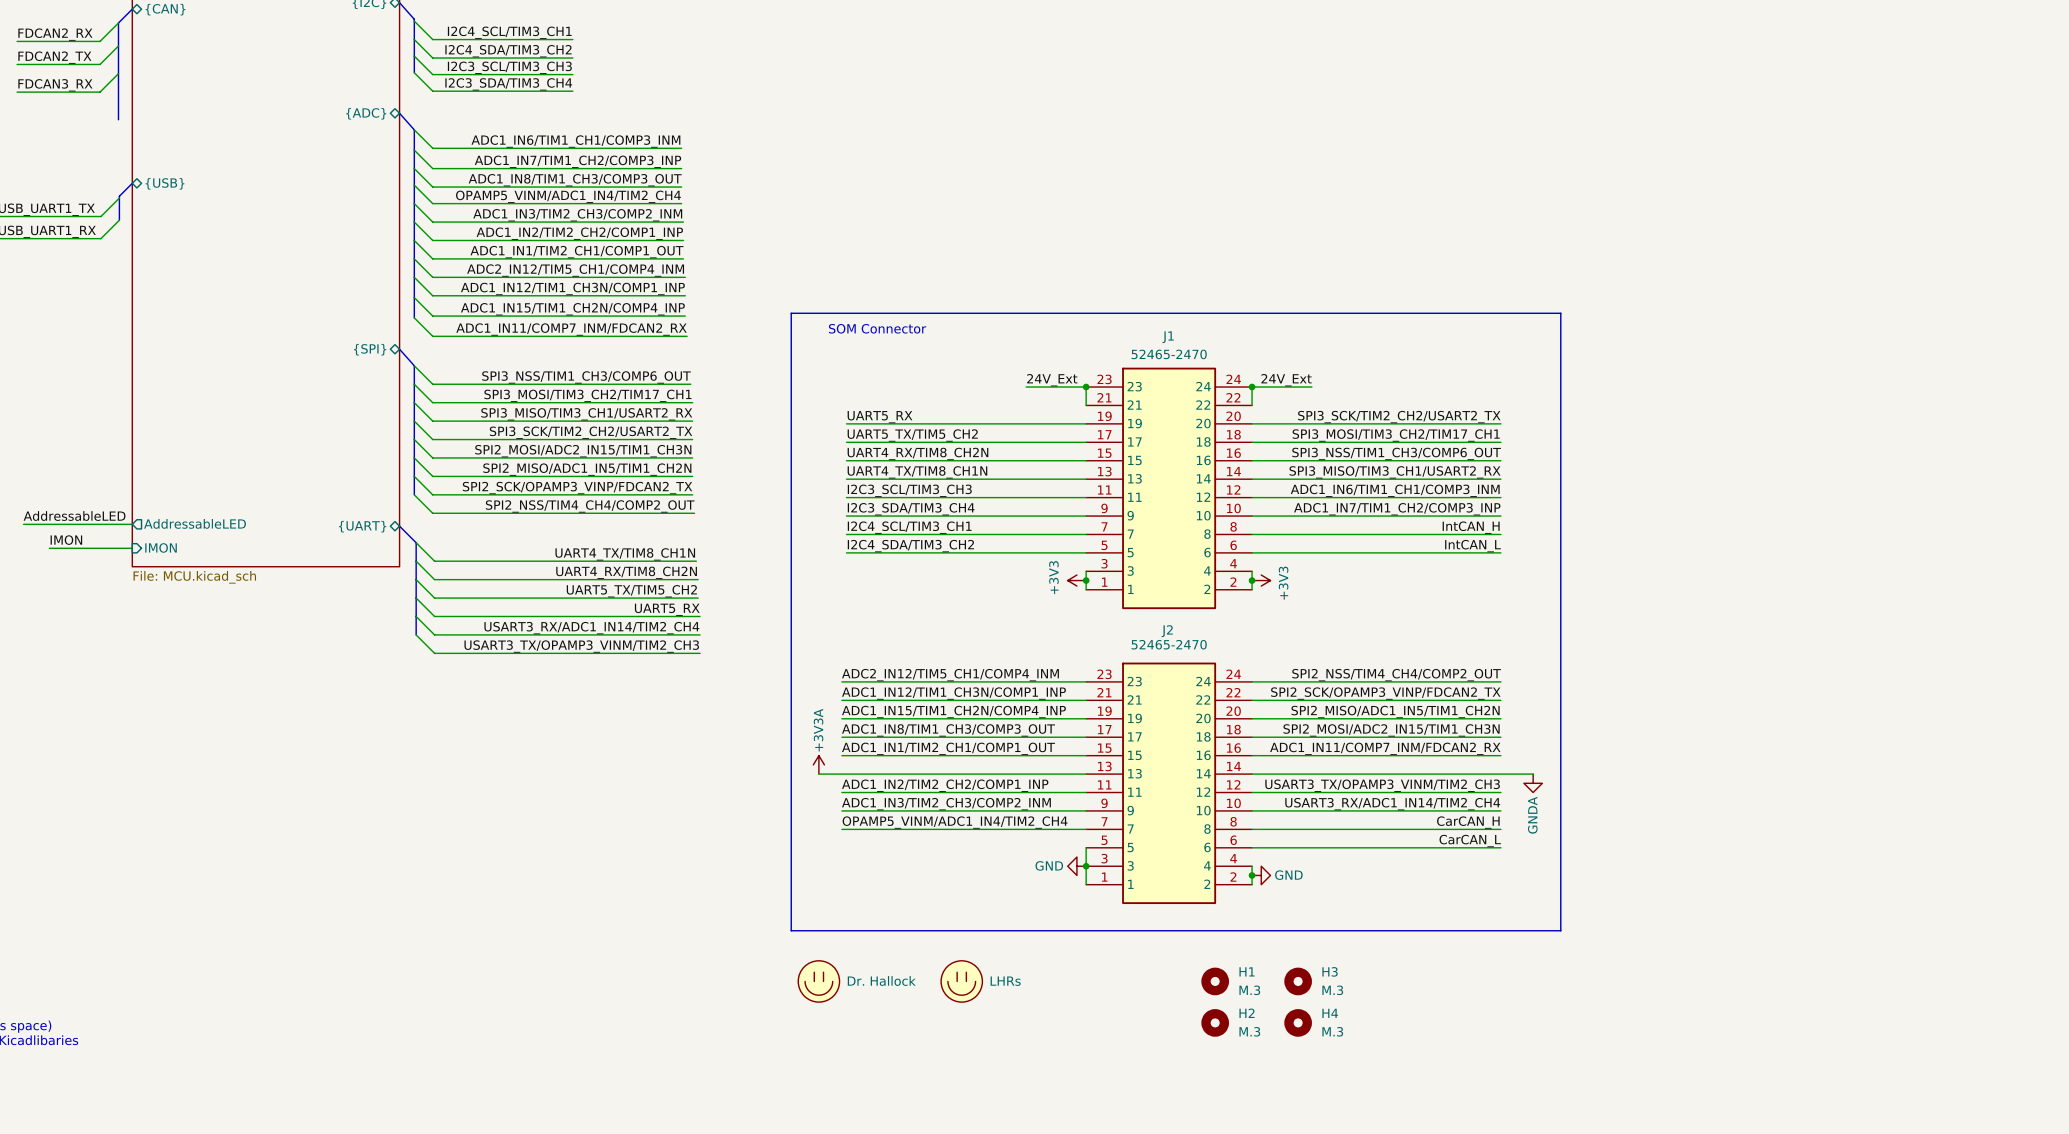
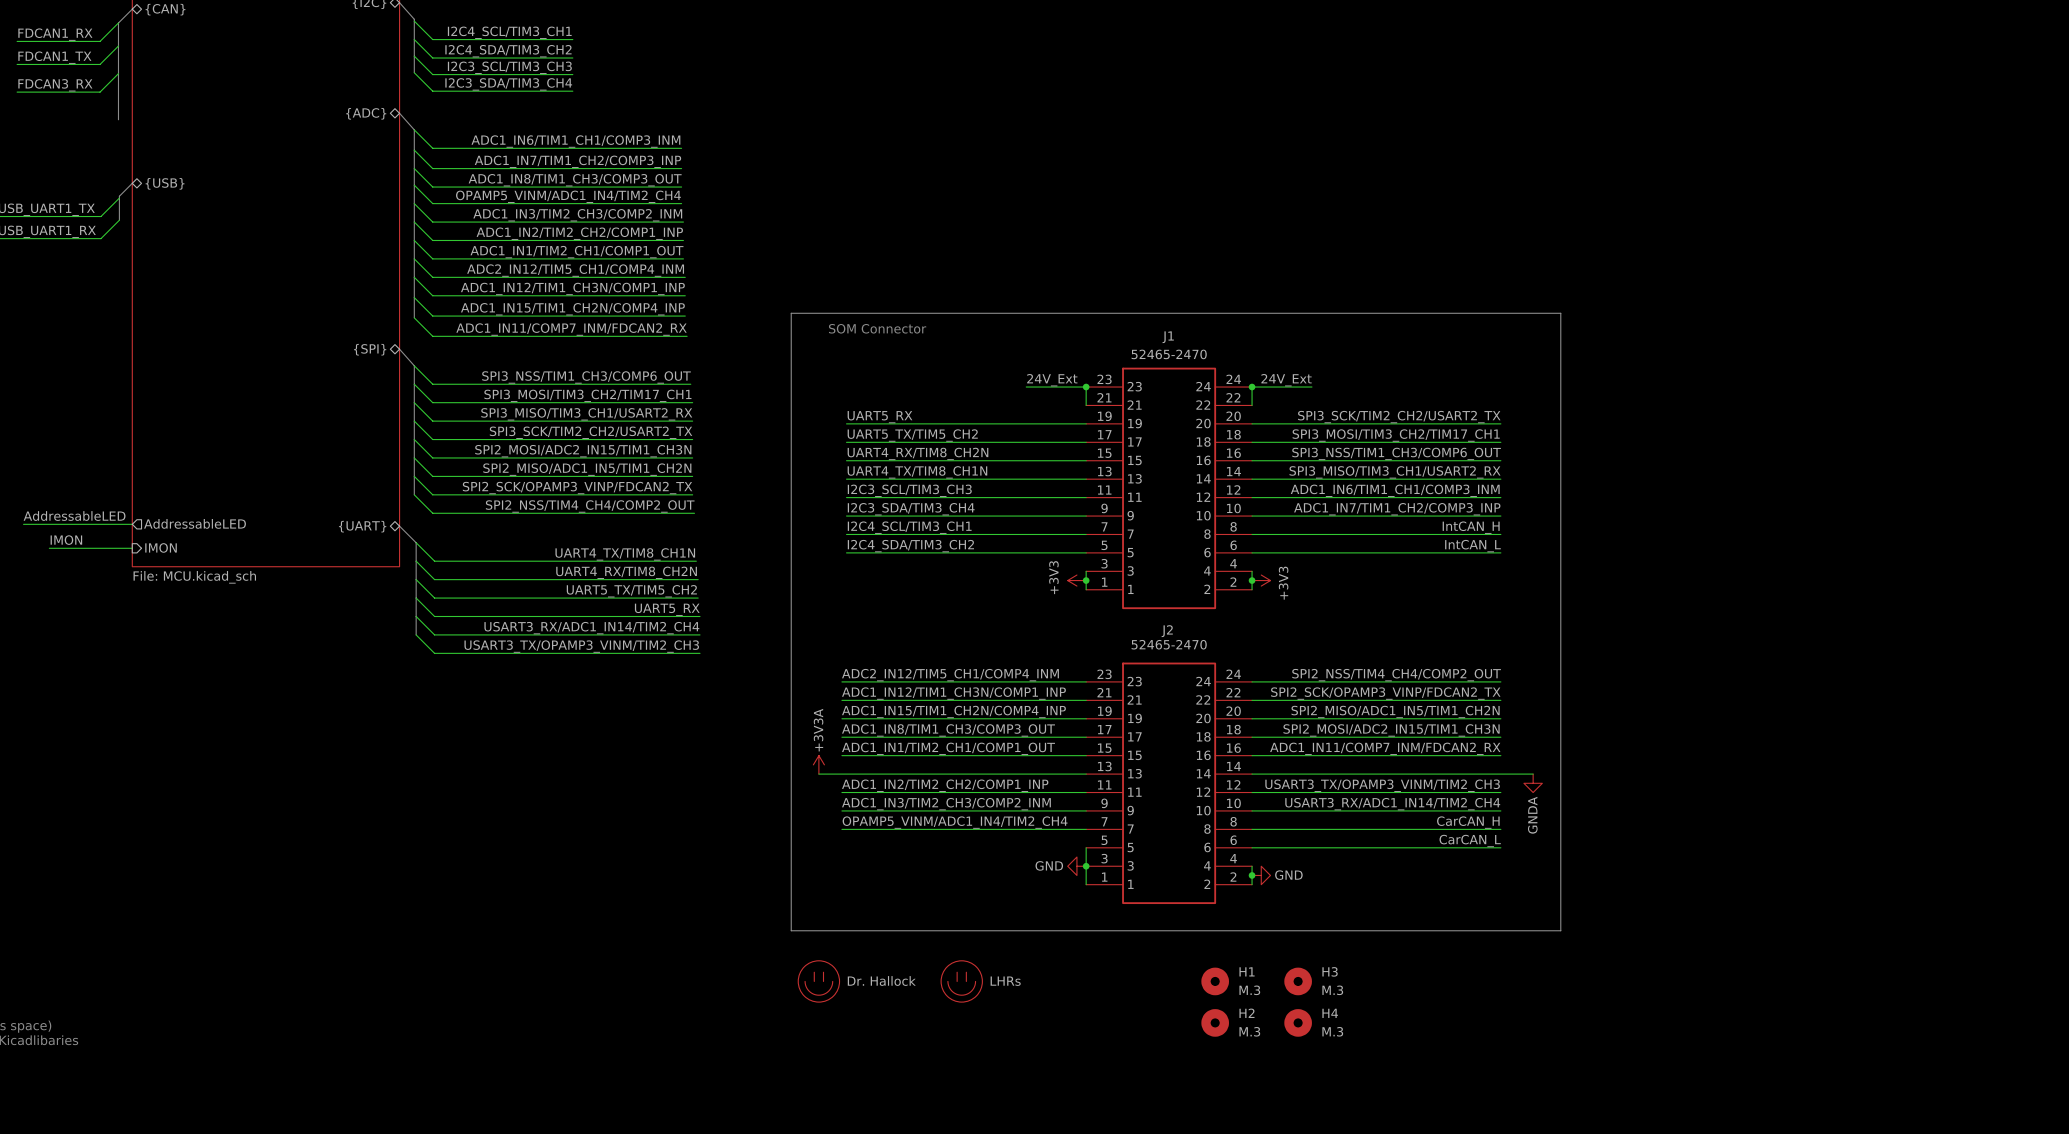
label: FDCAN2_RX (55, 34) -> FDCAN1_RX (55, 34)
label: FDCAN2_TX (54, 57) -> FDCAN1_TX (54, 57)

